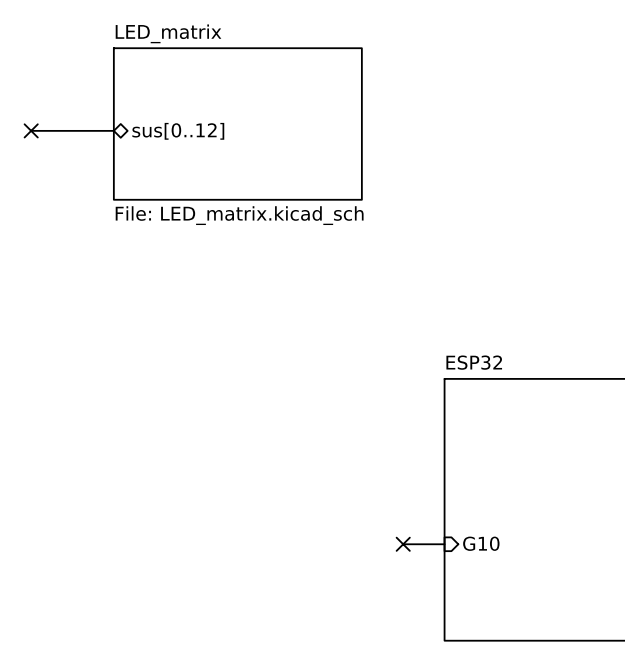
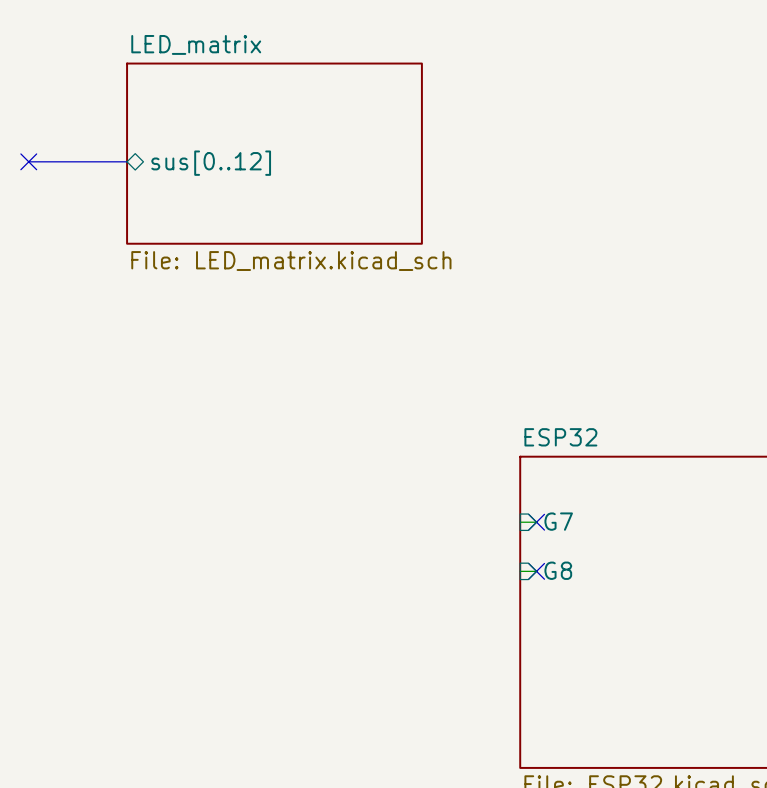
sheet pin: none -> G7 (558, 521)
wire: none -> (520, 522) (536, 522)
no-connect mark: none -> (536, 522)
sheet pin: none -> G8 (558, 570)
wire: none -> (520, 571) (536, 571)
no-connect mark: none -> (536, 571)
sheet pin: G10 (481, 543) -> none
wire: (403, 544) (444, 544) -> none
no-connect mark: (403, 544) -> none

